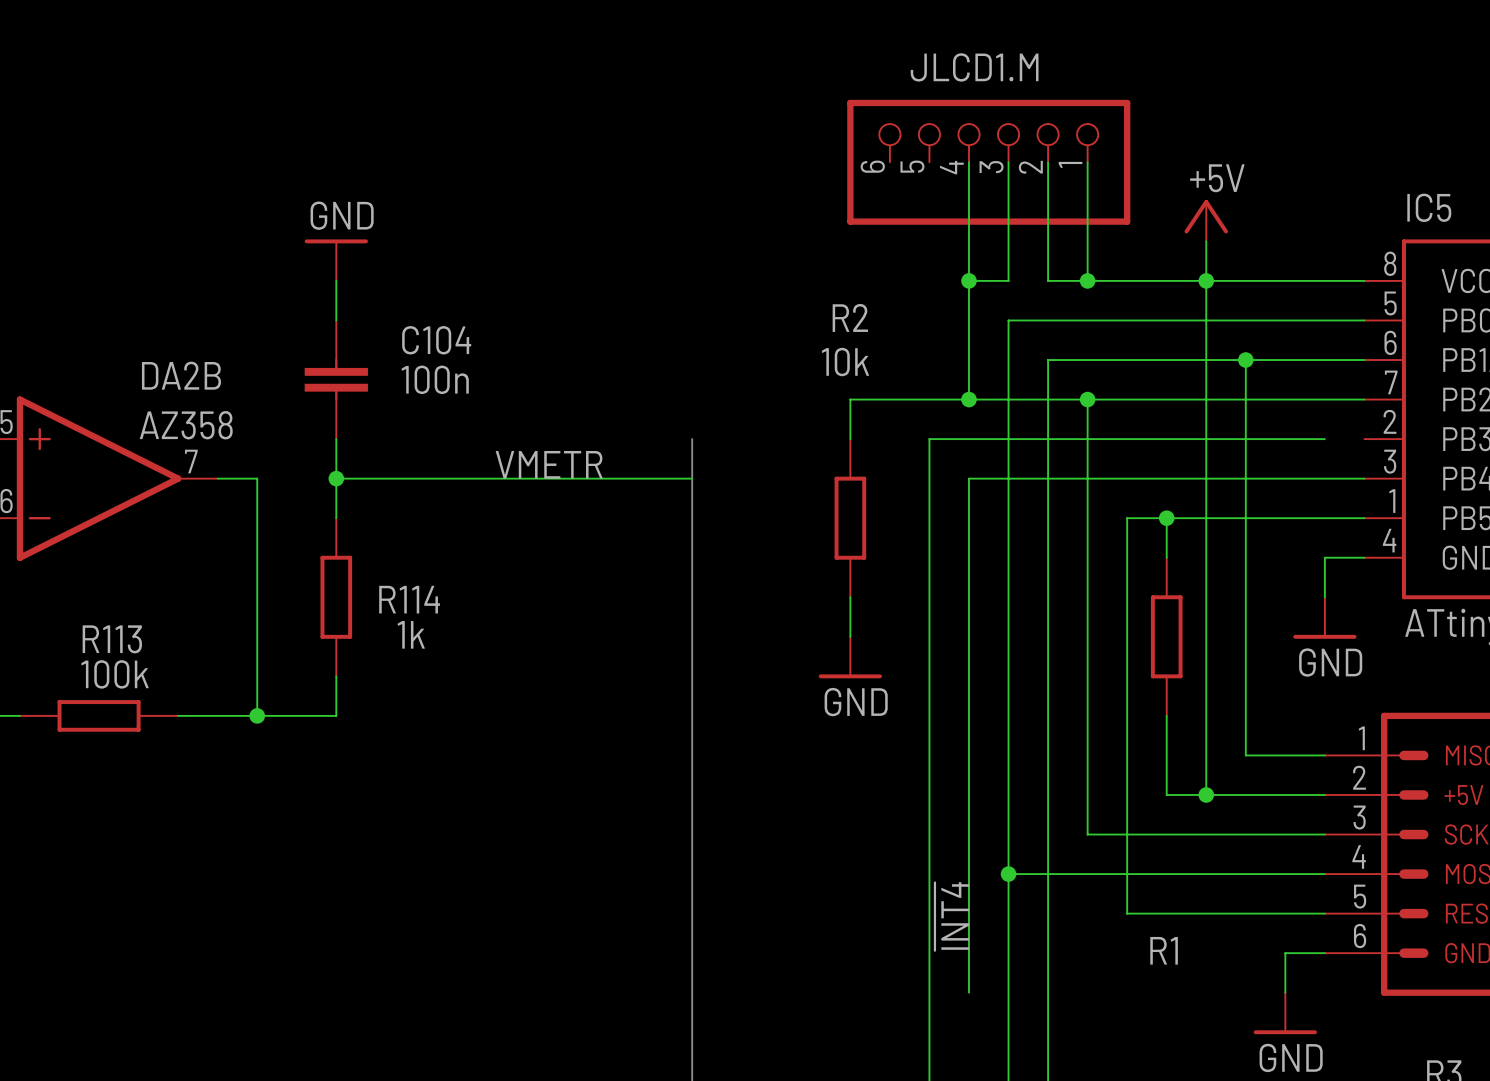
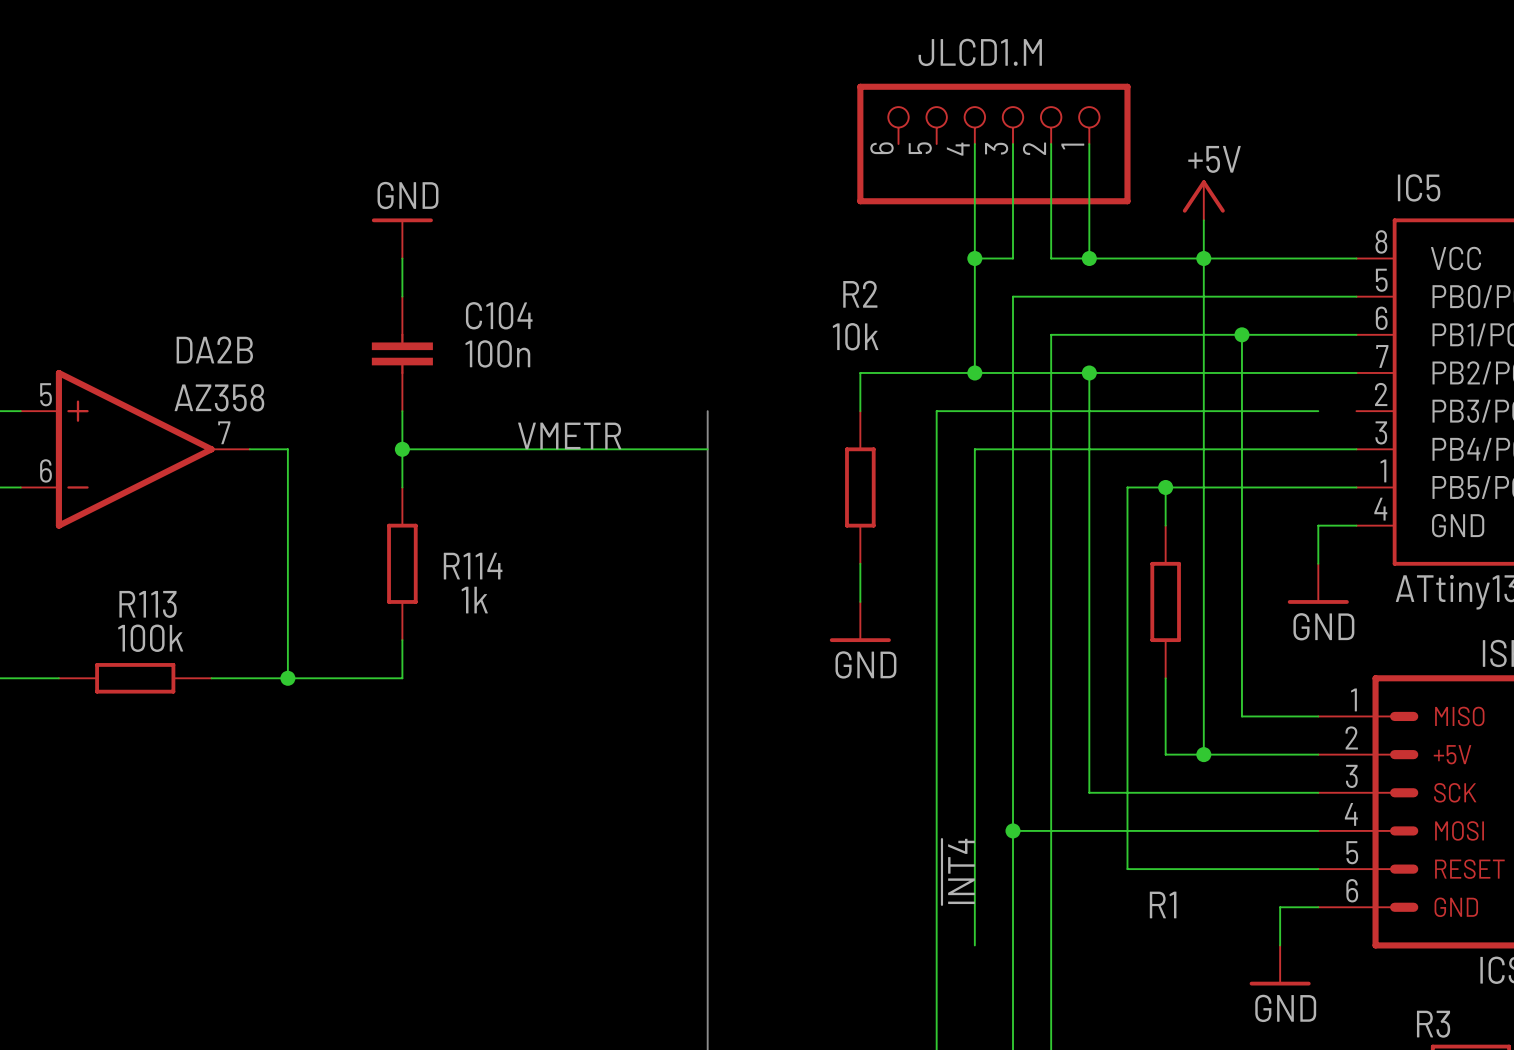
power symbol position: GND (336, 260) -> GND (402, 238)
wire: (336, 280) (336, 320) -> (402, 258) (402, 296)
C104 position: (336, 379) -> (402, 353)
wire: (336, 439) (336, 518) -> (402, 411) (402, 487)
wire: (336, 478) (375, 478) -> none
junction position: (336, 478) -> (402, 449)
R114 position: (336, 597) -> (402, 563)
wire: (336, 676) (336, 715) -> (402, 640) (402, 678) (364, 678)

